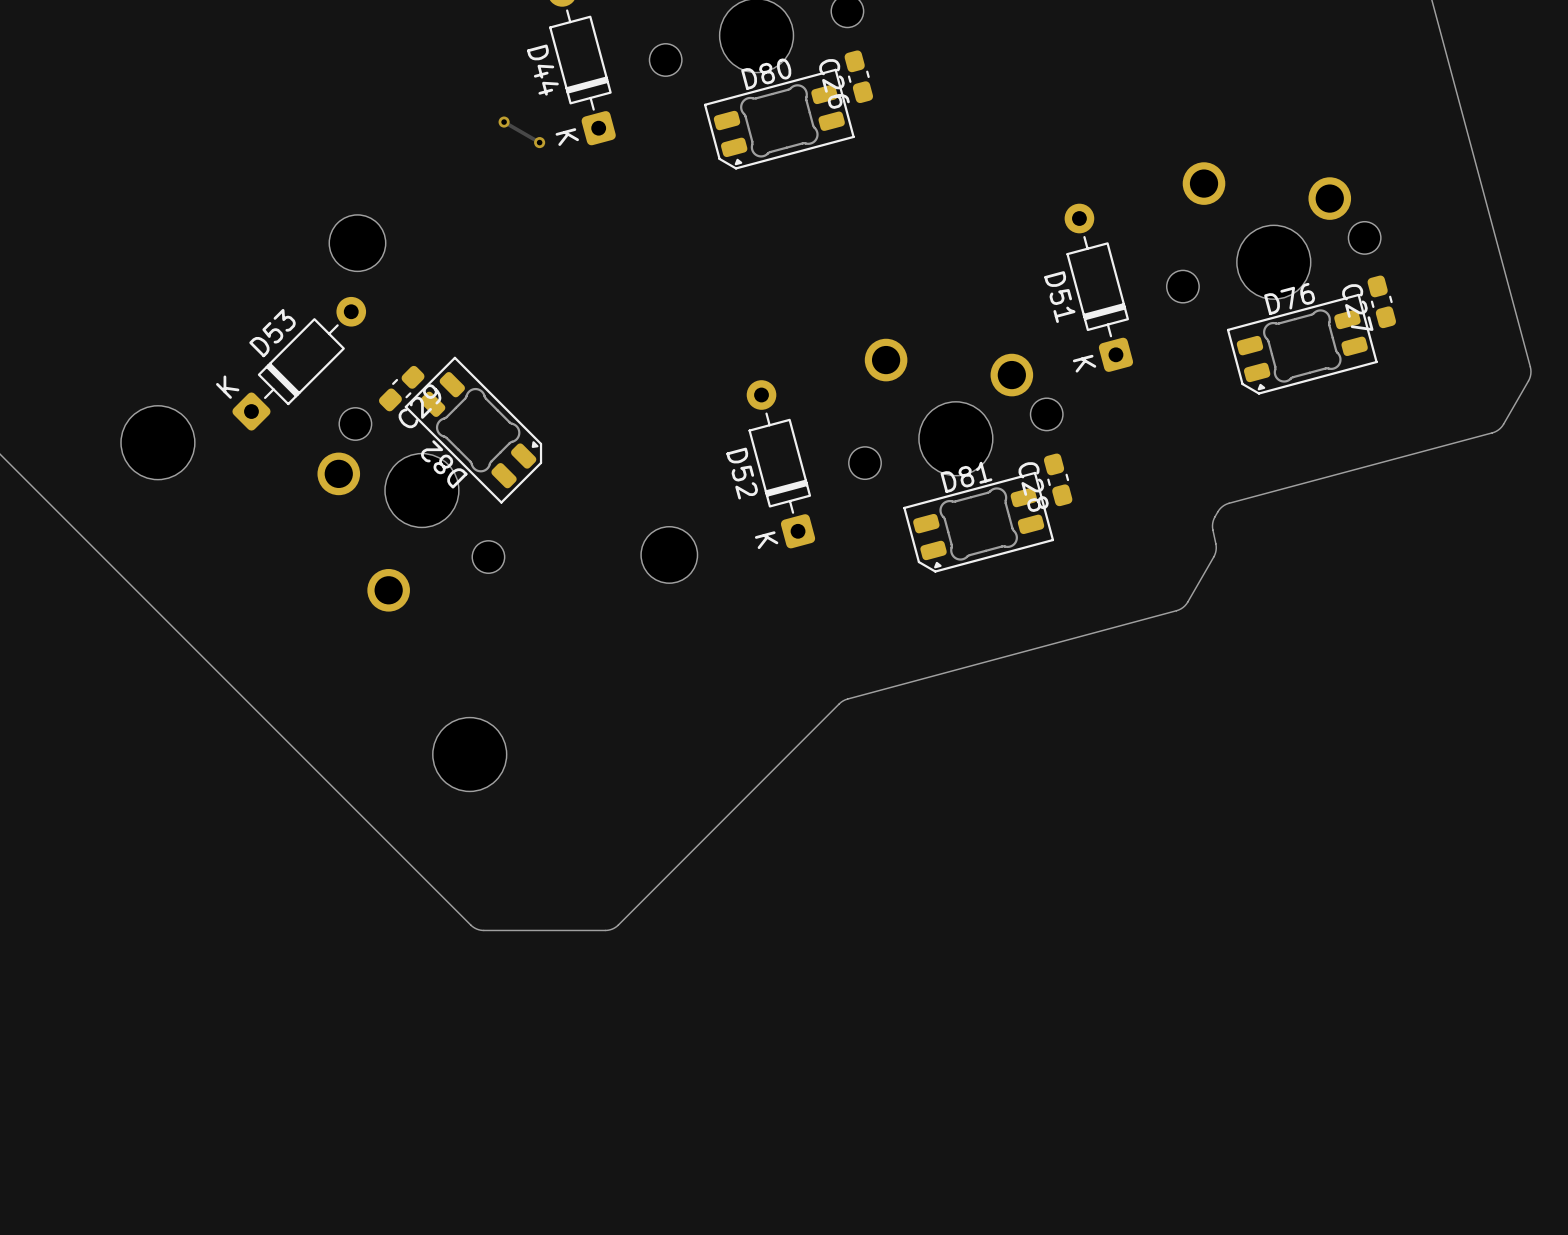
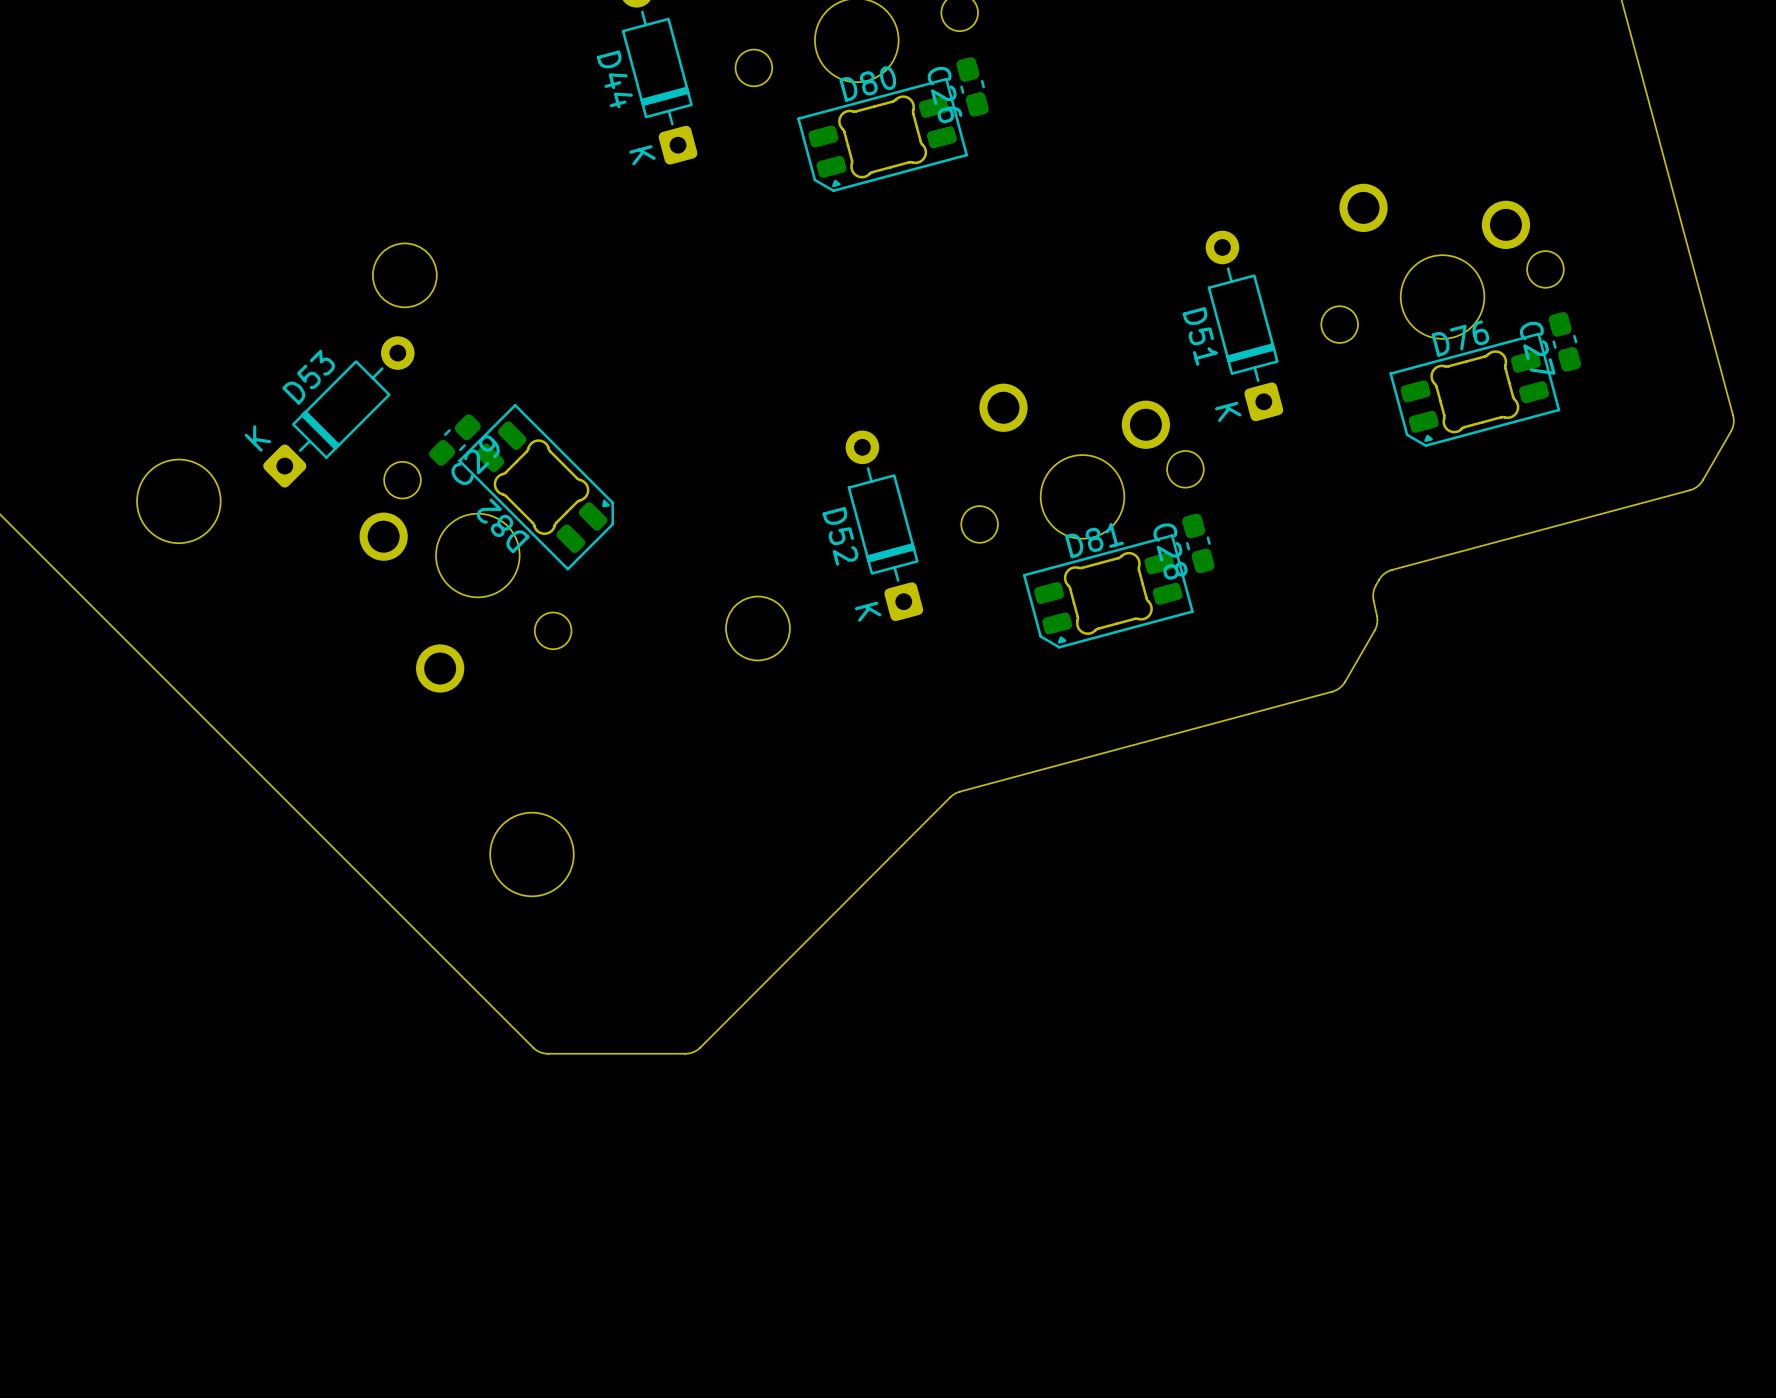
track: (504, 122) (539, 142) -> none
via: (504, 122) -> none
via: (539, 142) -> none

